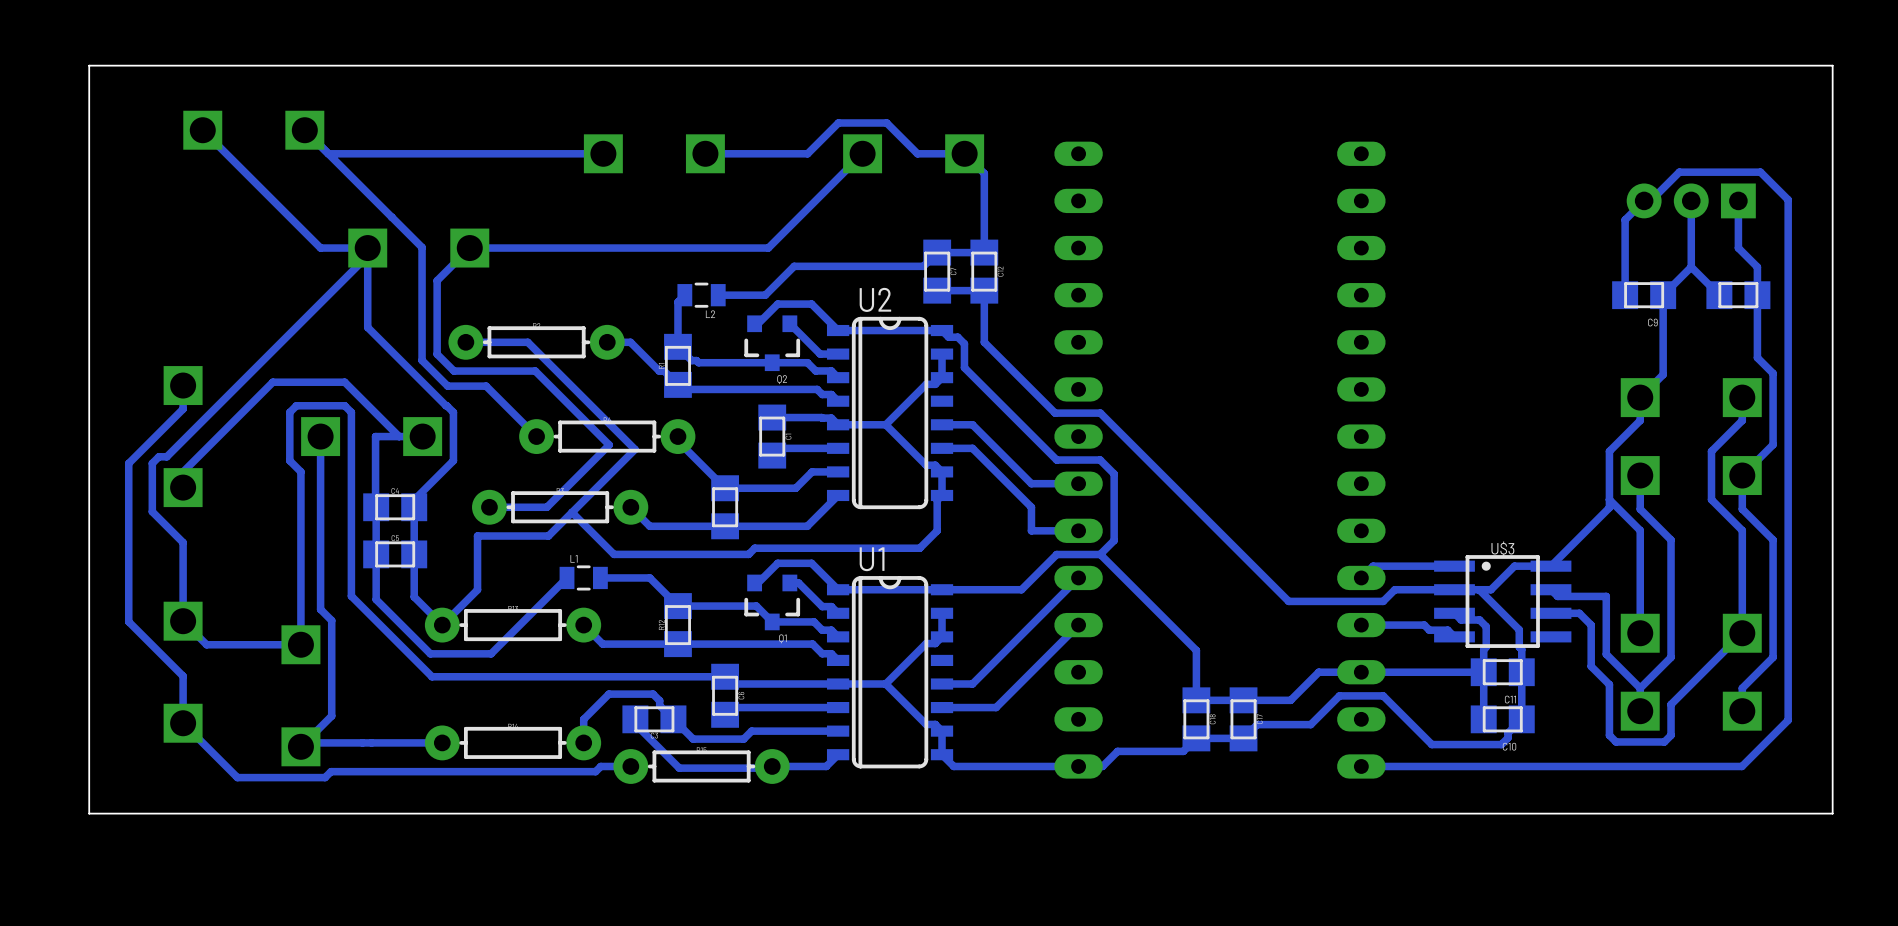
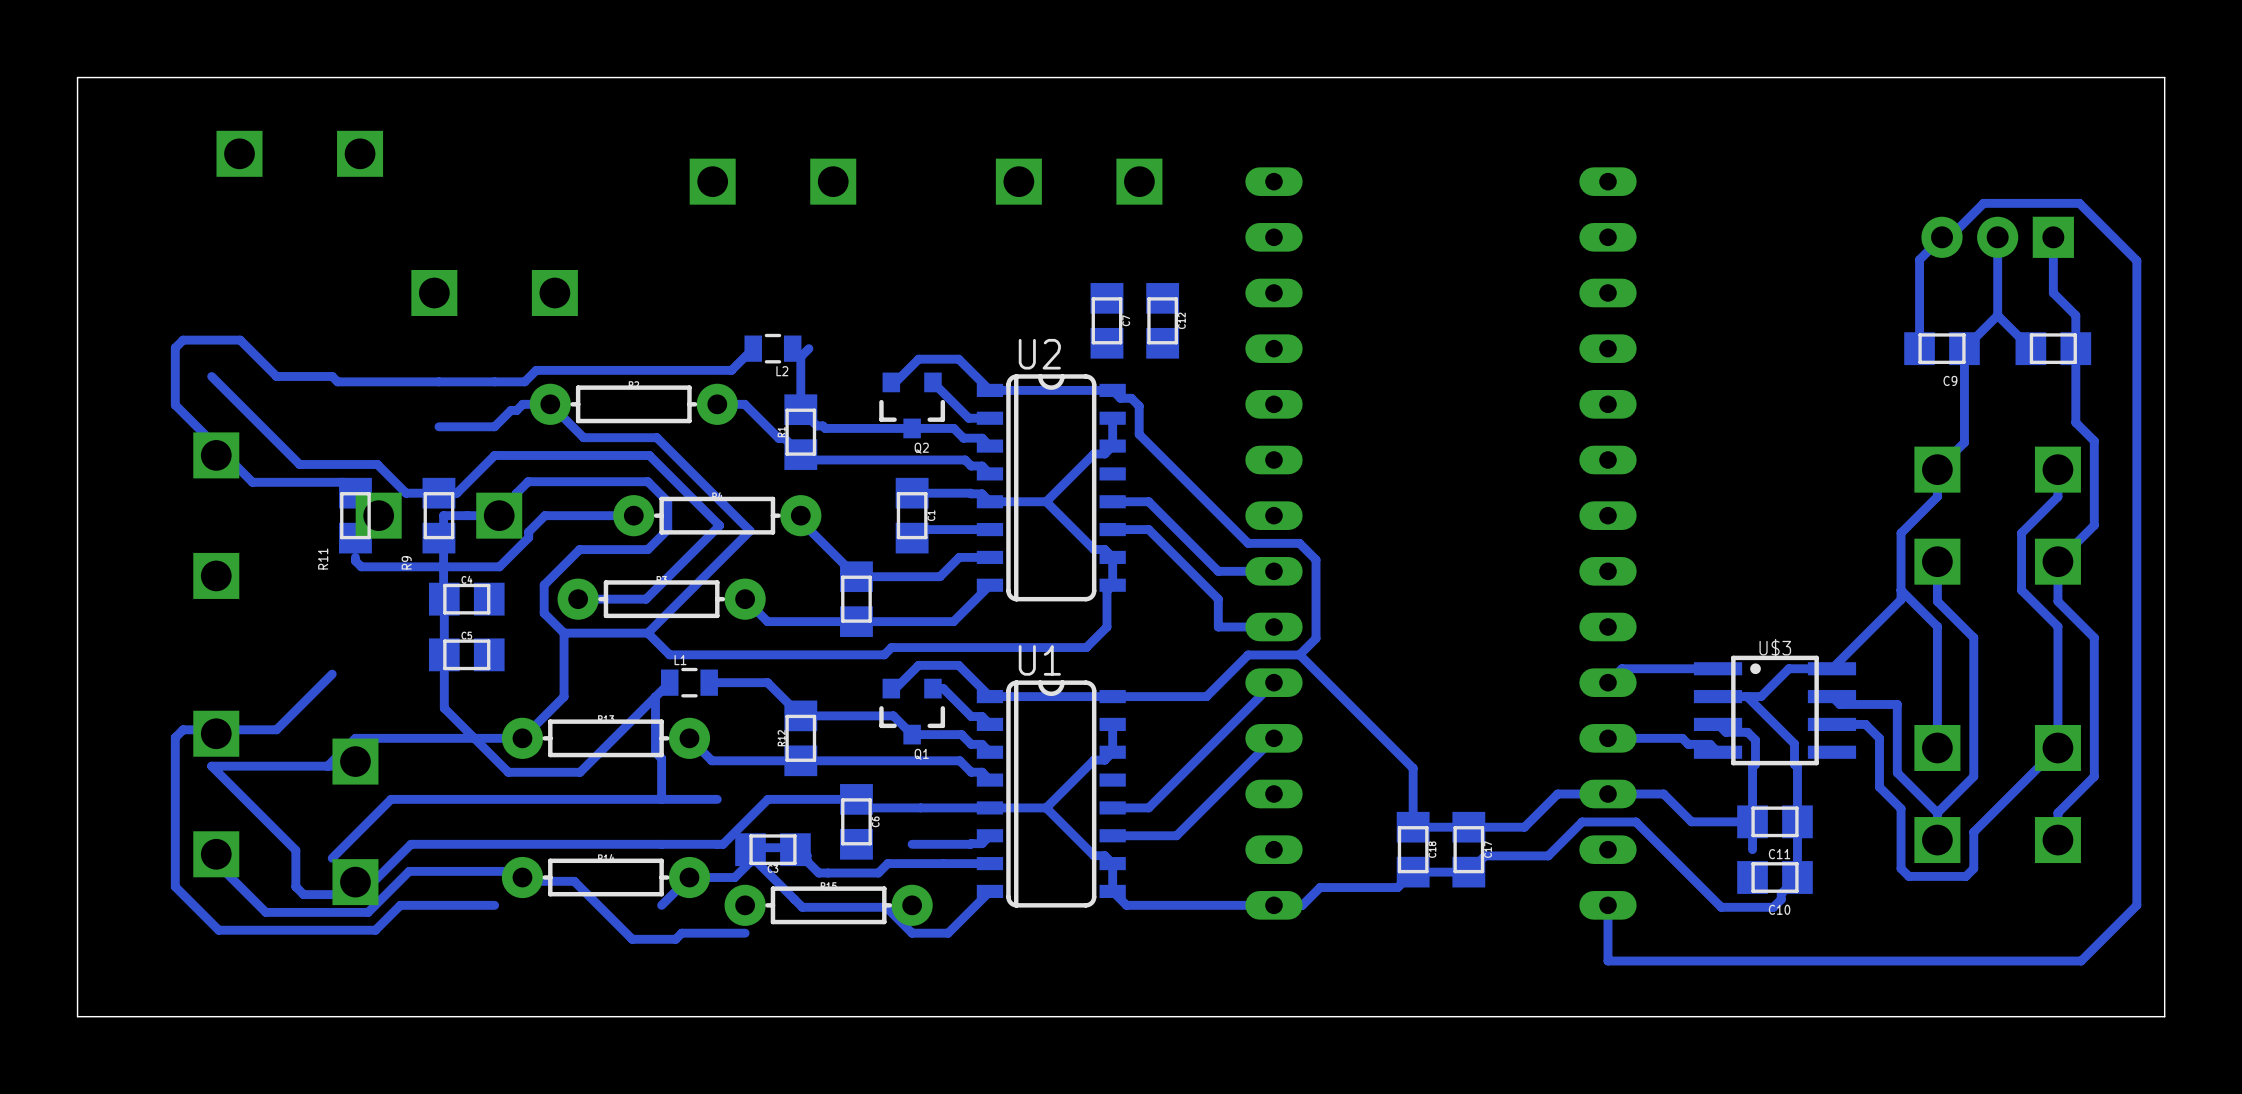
board edge: (89, 65) (89, 813) (1832, 813) -> (105, 77) (77, 77) (77, 1016) (2164, 1016) (2164, 961)
bottom track: (202, 130) (320, 248) (367, 248) (367, 327) (453, 412) (453, 460) (414, 499) (414, 596) (442, 625) -> (327, 766) (355, 738) (522, 738)
bottom track: (304, 130) (422, 247) (422, 360) (447, 386) (486, 386) (536, 436) -> none
bottom track: (603, 153) (328, 153) -> none
bottom track: (705, 153) (807, 153) (838, 122) (886, 122) (917, 153) (964, 153) (984, 173) (984, 252) (937, 252) (923, 266) (794, 266) (765, 295) (718, 295) -> none
bottom track: (862, 153) (768, 248) (469, 248) (437, 280) (437, 354) (453, 371) (535, 371) (549, 385) -> (211, 376) (299, 464) (377, 464) (406, 493) (456, 493) (494, 455) (649, 455)
bottom track: (1788, 199) (1788, 720) (1741, 766) (1361, 766) -> (2112, 236) (2136, 260) (2136, 905) (2081, 961) (1608, 961) (1608, 905)
bottom track: (367, 255) (166, 456) (158, 456) (152, 463) (152, 511) (183, 542) (183, 621) (206, 644) (300, 644) (300, 474) -> (633, 515) (544, 515) (528, 531) (528, 537) (499, 566) (361, 566) (355, 560)
bottom track: (937, 290) (984, 290) (984, 342) (1055, 413) (1100, 413) (1288, 601) (1383, 601) (1394, 589) (1454, 589) -> none
bottom track: none -> (753, 348) (731, 370) (536, 370) (524, 381) (337, 381) (332, 376) (276, 376) (240, 340) (183, 340) (175, 347) (175, 405) (252, 482) (344, 482) (355, 493)
L2 position: (701, 295) -> (772, 348)
bottom track: (465, 342) (527, 342) (556, 370) -> (438, 426) (494, 426) (510, 410) (516, 410) (522, 404) (550, 404) (583, 437) (656, 437)
bottom track: (183, 385) (183, 409) (128, 463) (128, 621) (183, 676) (183, 723) (237, 777) (325, 777) (331, 771) (595, 771) (600, 766) (630, 766) -> none
R11: none -> (355, 515)
bottom track: (320, 436) (320, 609) (331, 620) (331, 716) (300, 746) -> none
R9: none -> (438, 515)
bottom track: (399, 436) (344, 382) (272, 382) (183, 471) (183, 487) -> none
bottom track: none -> (499, 515) (516, 499) (516, 493) (528, 481) (647, 481) (667, 501) (667, 529) (647, 549) (579, 549) (544, 585) (544, 613) (564, 633)
bottom track: (300, 471) (289, 460) (289, 412) (296, 405) (344, 405) (351, 412) (351, 596) (432, 676) -> (332, 858) (391, 799) (510, 799)
bottom track: (572, 512) (614, 554) -> (647, 633) (669, 654) (725, 654)
bottom track: none -> (332, 674) (276, 729) (183, 729) (175, 737) (175, 886) (218, 930) (375, 930) (400, 905) (494, 905)
bottom track: none -> (655, 696) (655, 752) (661, 758) (661, 799)
bottom track: (1483, 672) (1408, 672) -> (1752, 821) (1691, 821) (1663, 794)
C11 position: (1502, 672) -> (1775, 821)
bottom track: (650, 676) (607, 676) -> (767, 799) (723, 844) (411, 844) (360, 894) (303, 894) (295, 886) (295, 850) (211, 766) (332, 766)
bottom track: (1383, 695) (1431, 744) (1501, 744) (1508, 737) (1508, 733) (1521, 719) -> (1633, 821) (1635, 821) (1721, 907) (1773, 907) (1781, 899) (1781, 893) (1797, 877) (1797, 849)
bottom track: (838, 707) (732, 707) (725, 714) -> (989, 835) (982, 843) (912, 844)
C10 position: (1502, 719) -> (1775, 877)
bottom track: none -> (211, 858) (265, 912) (368, 912) (409, 871) (508, 871) (518, 881) (574, 881) (632, 939) (675, 939) (681, 933) (745, 933)
bottom track: (683, 729) (659, 705) (659, 700) (653, 694) (608, 694) (583, 719) (583, 742) -> (807, 861) (807, 855) (799, 847) (757, 847) (749, 855) (749, 862) (734, 877) (689, 877) (661, 905)
bottom track: (442, 742) (304, 742) -> none
bottom track: (826, 766) (750, 768) -> (976, 905) (948, 933) (912, 933) (886, 907)

